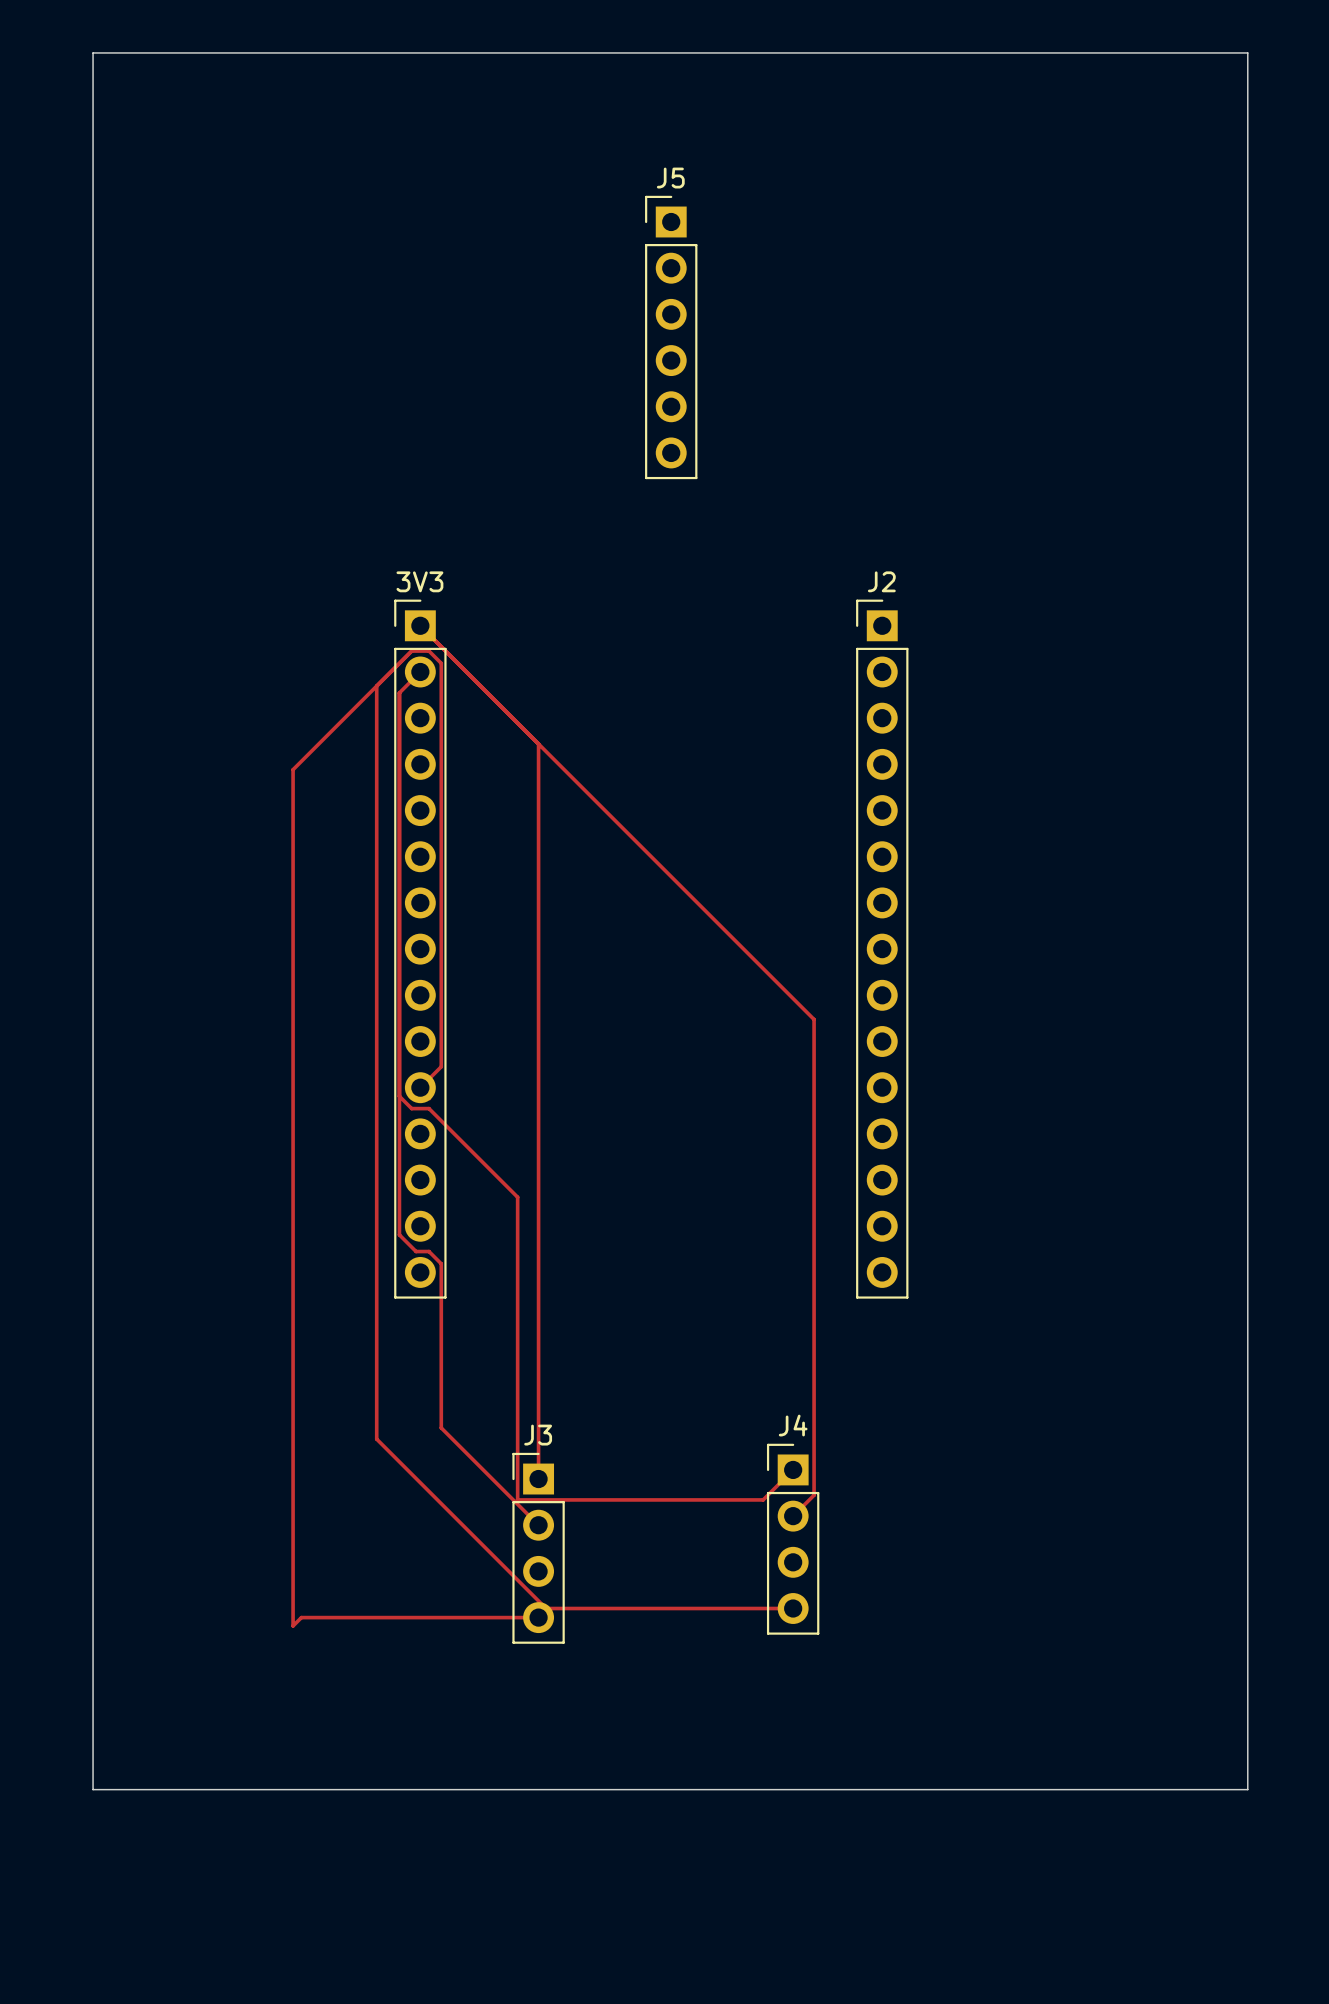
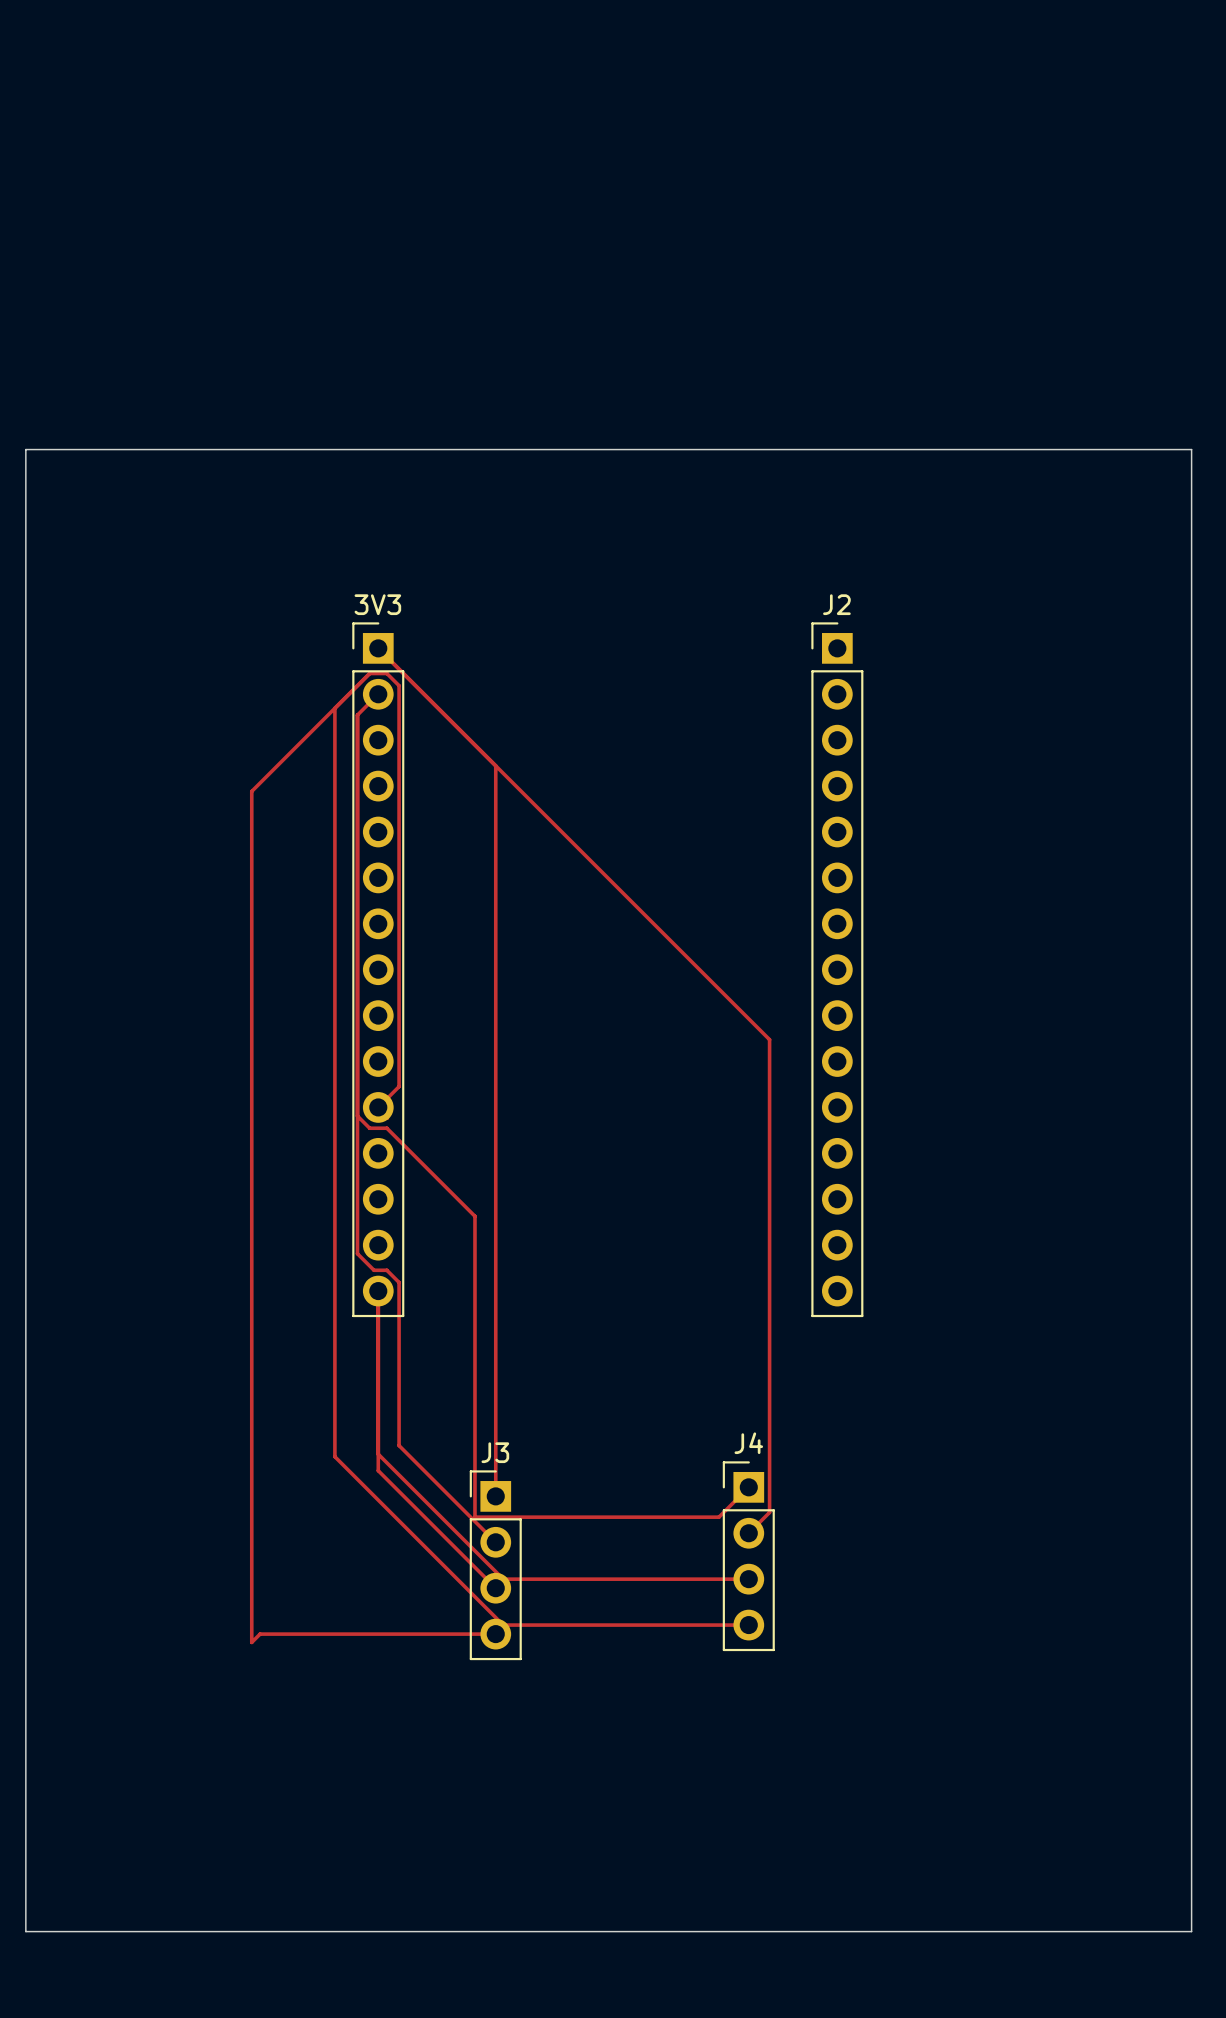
board edge: (93, 52) (1247, 52) (1247, 1789) (93, 1789) (93, 52) -> (25, 449) (25, 1931) (1191, 1931) (1191, 449) (25, 449)
J5: (671, 337) -> none
track: none -> (378, 1291) (378, 1470) (495, 1588)
track: none -> (378, 1454) (503, 1579) (748, 1579)

